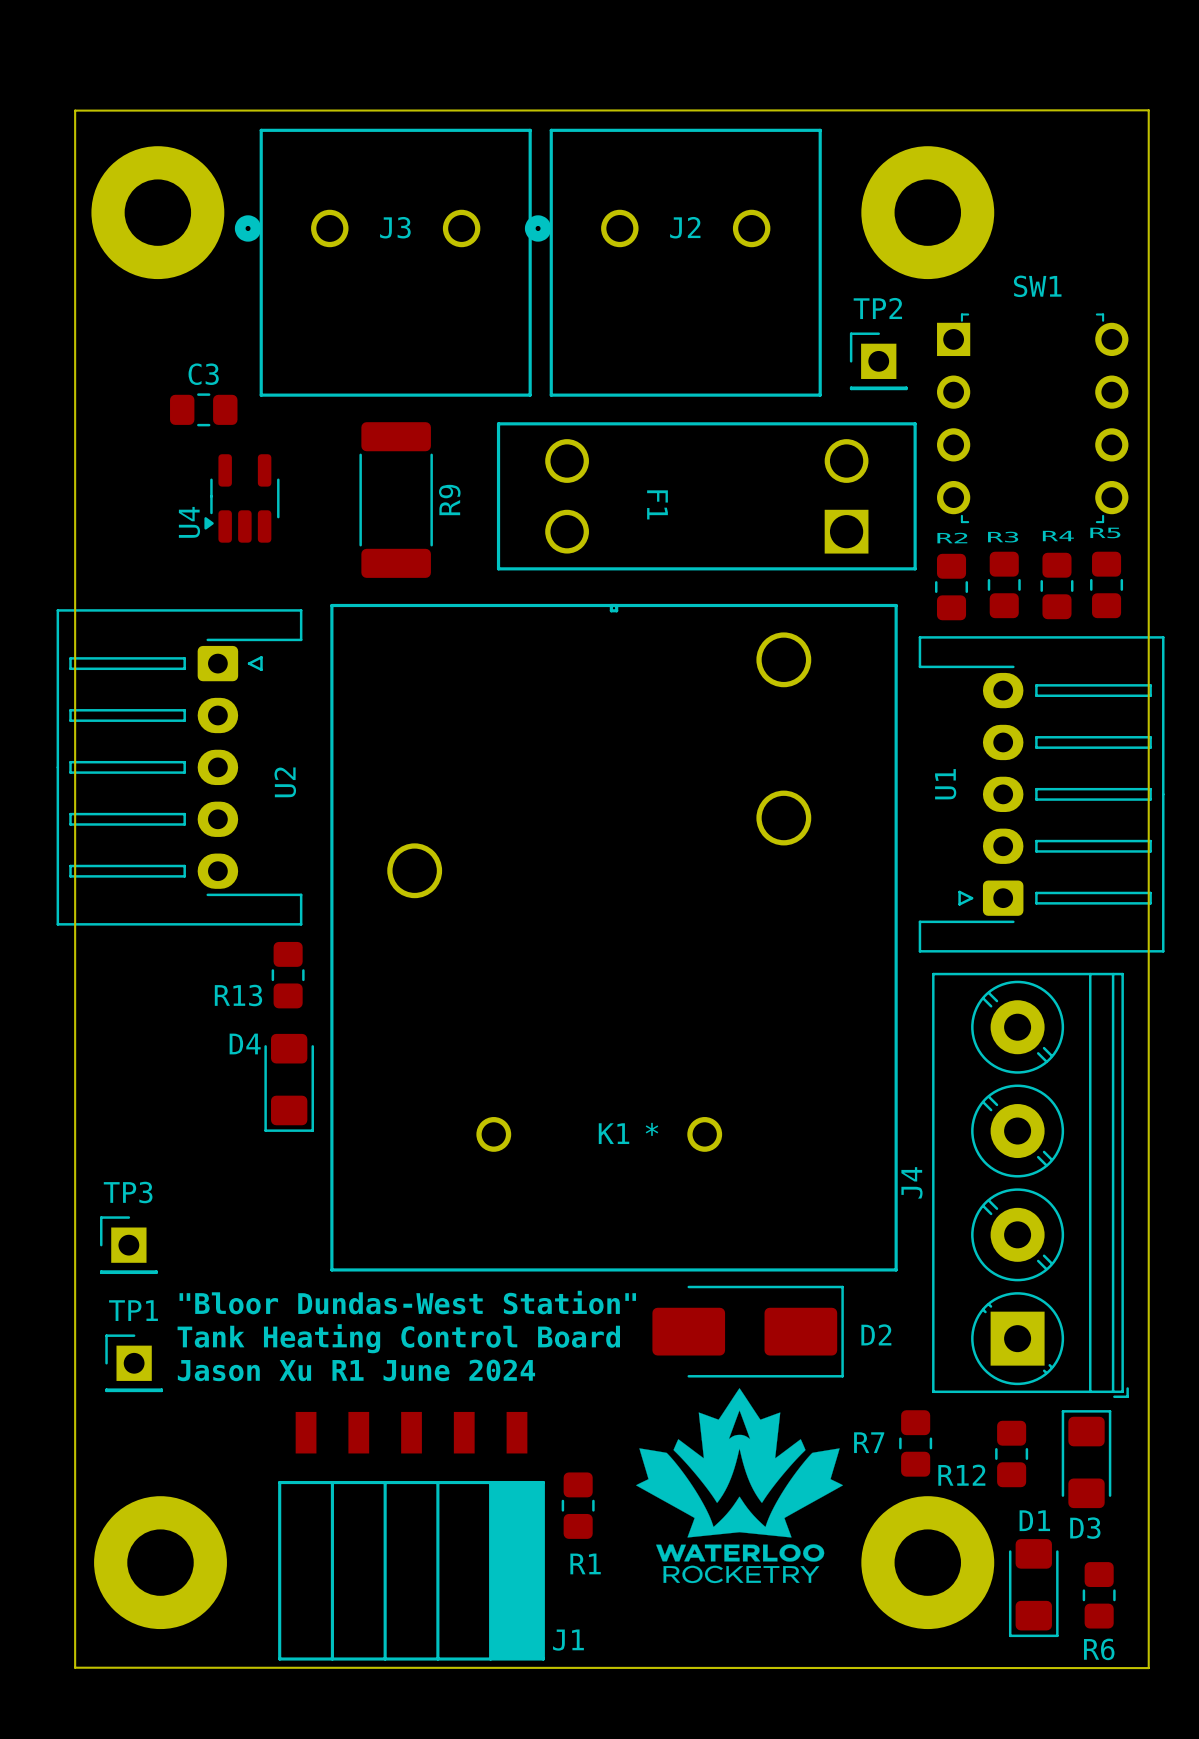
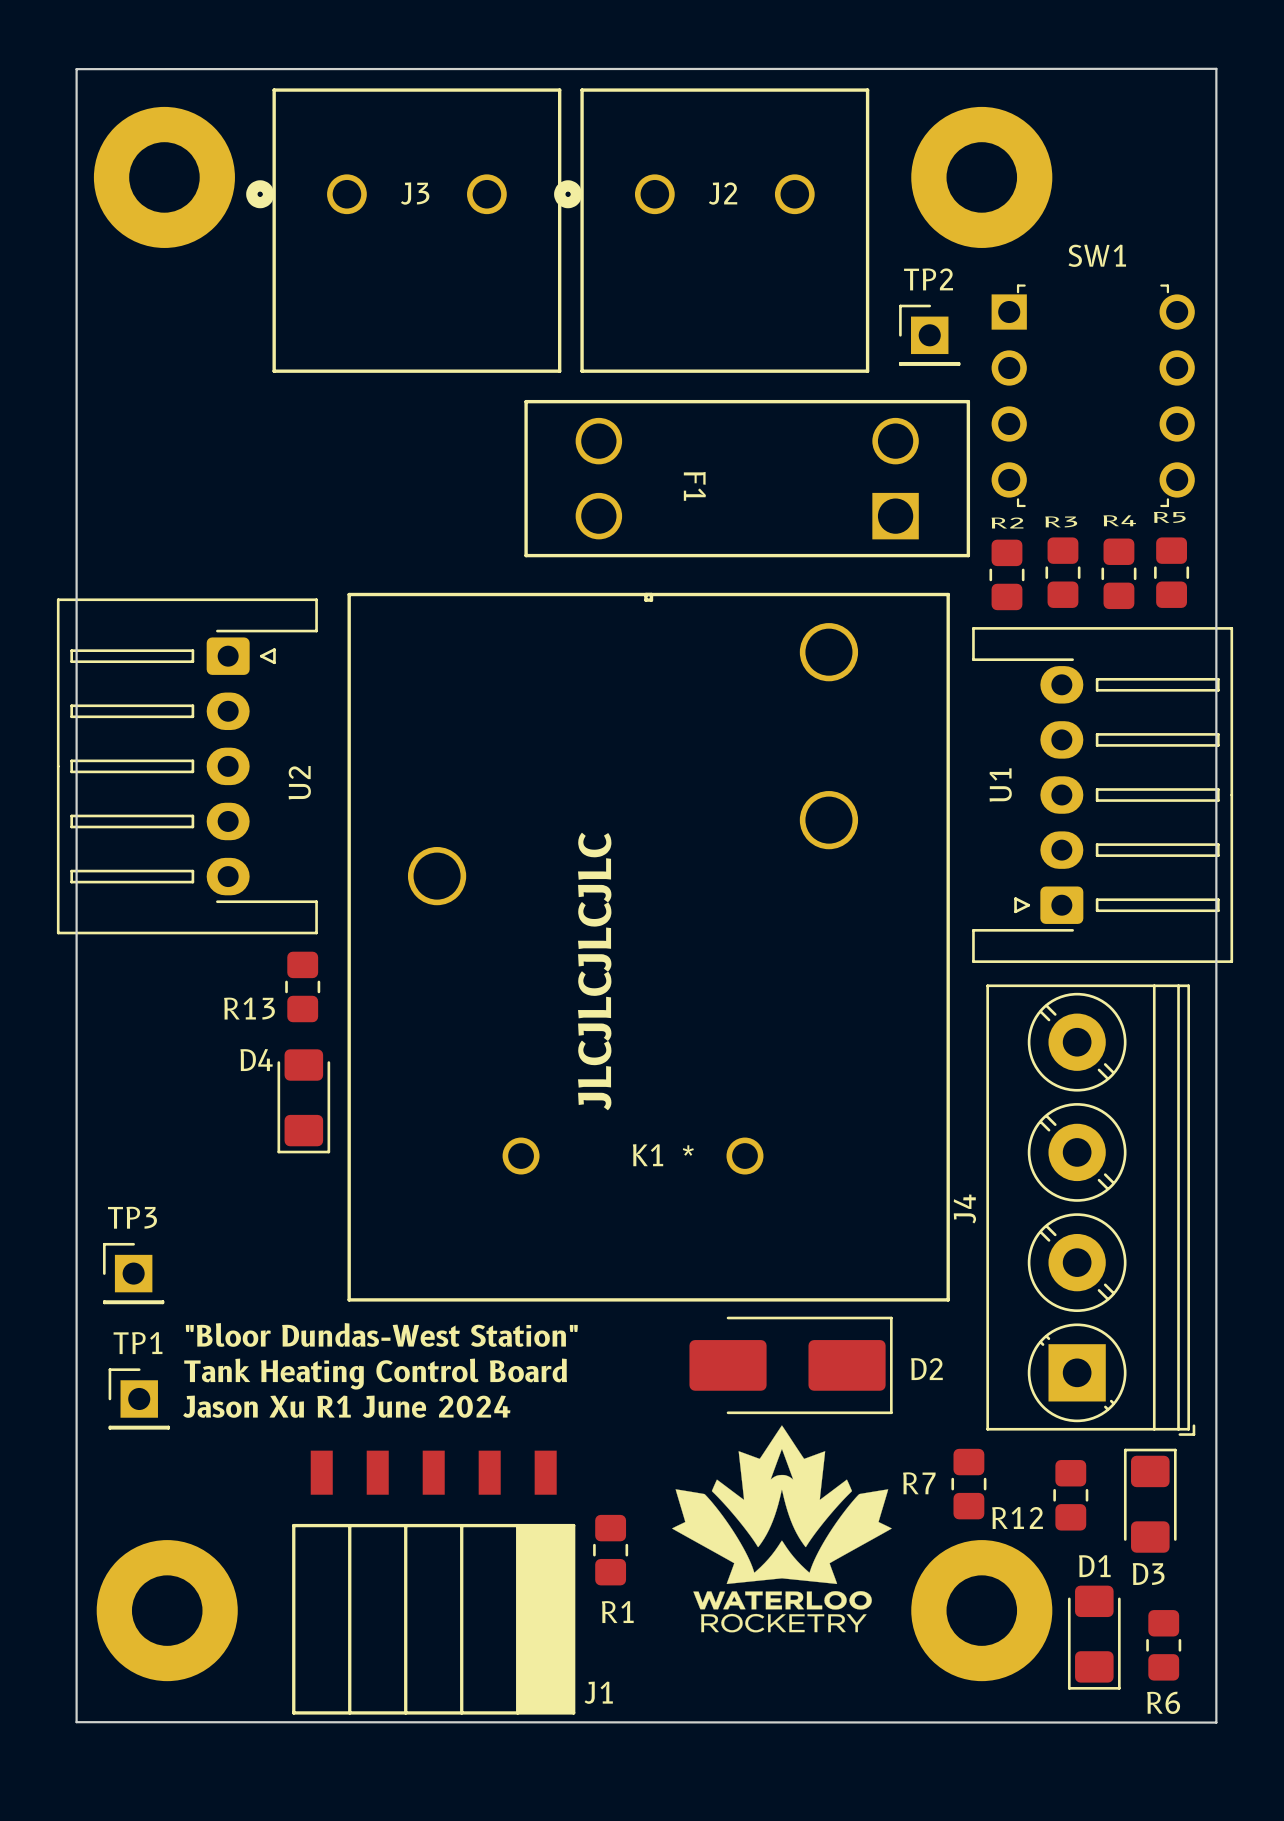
C3: (203, 409) -> none
U4: (241, 498) -> none
R9: (396, 500) -> none
text: none -> JLCJLCJLCJLC (594, 971)

